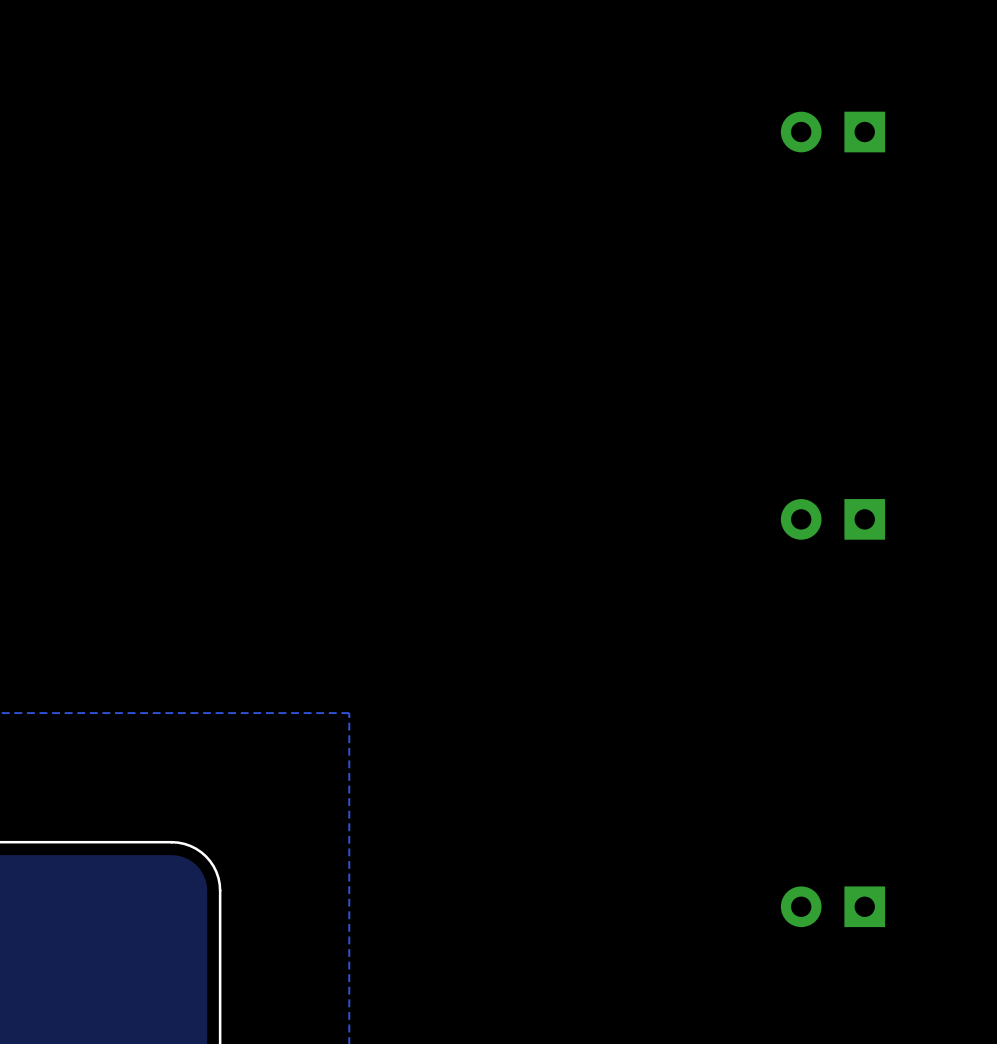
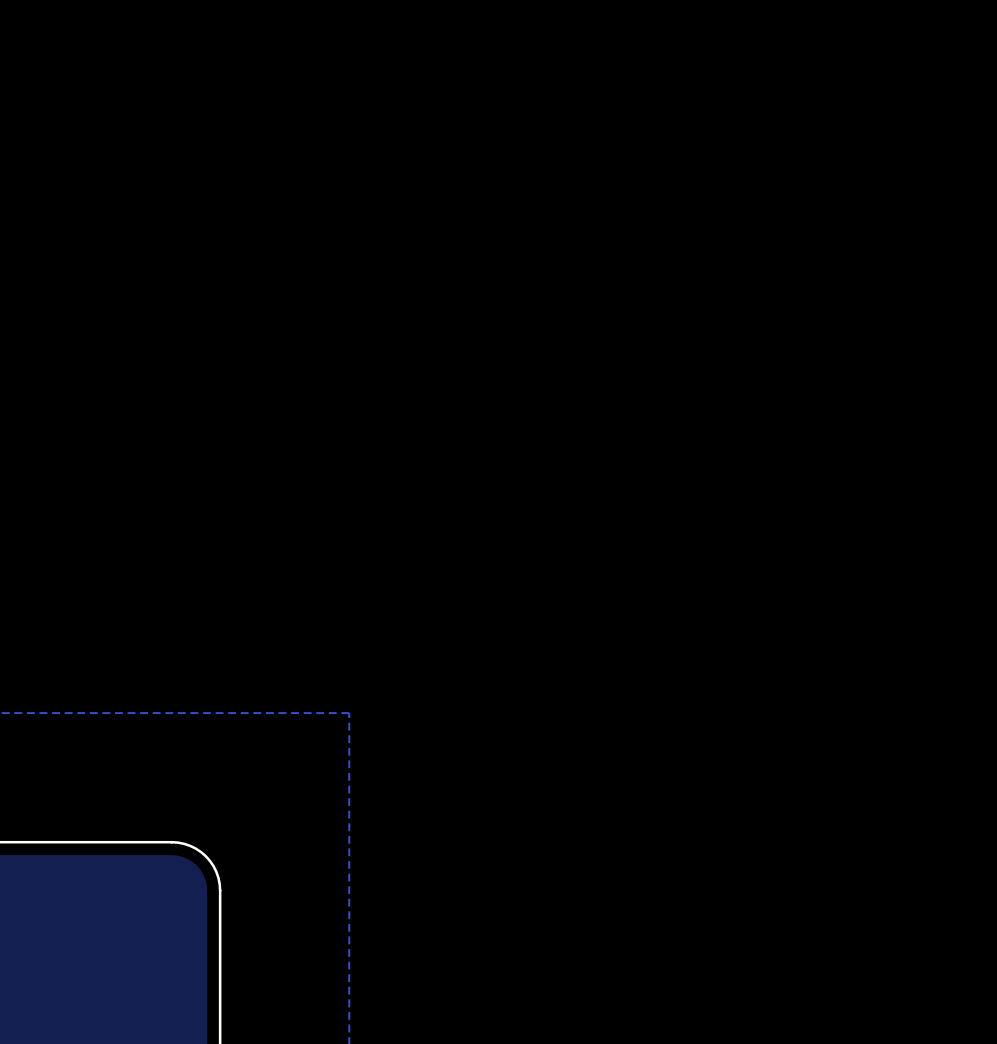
part: (832, 132) -> none
part: (832, 519) -> none
part: (832, 906) -> none

